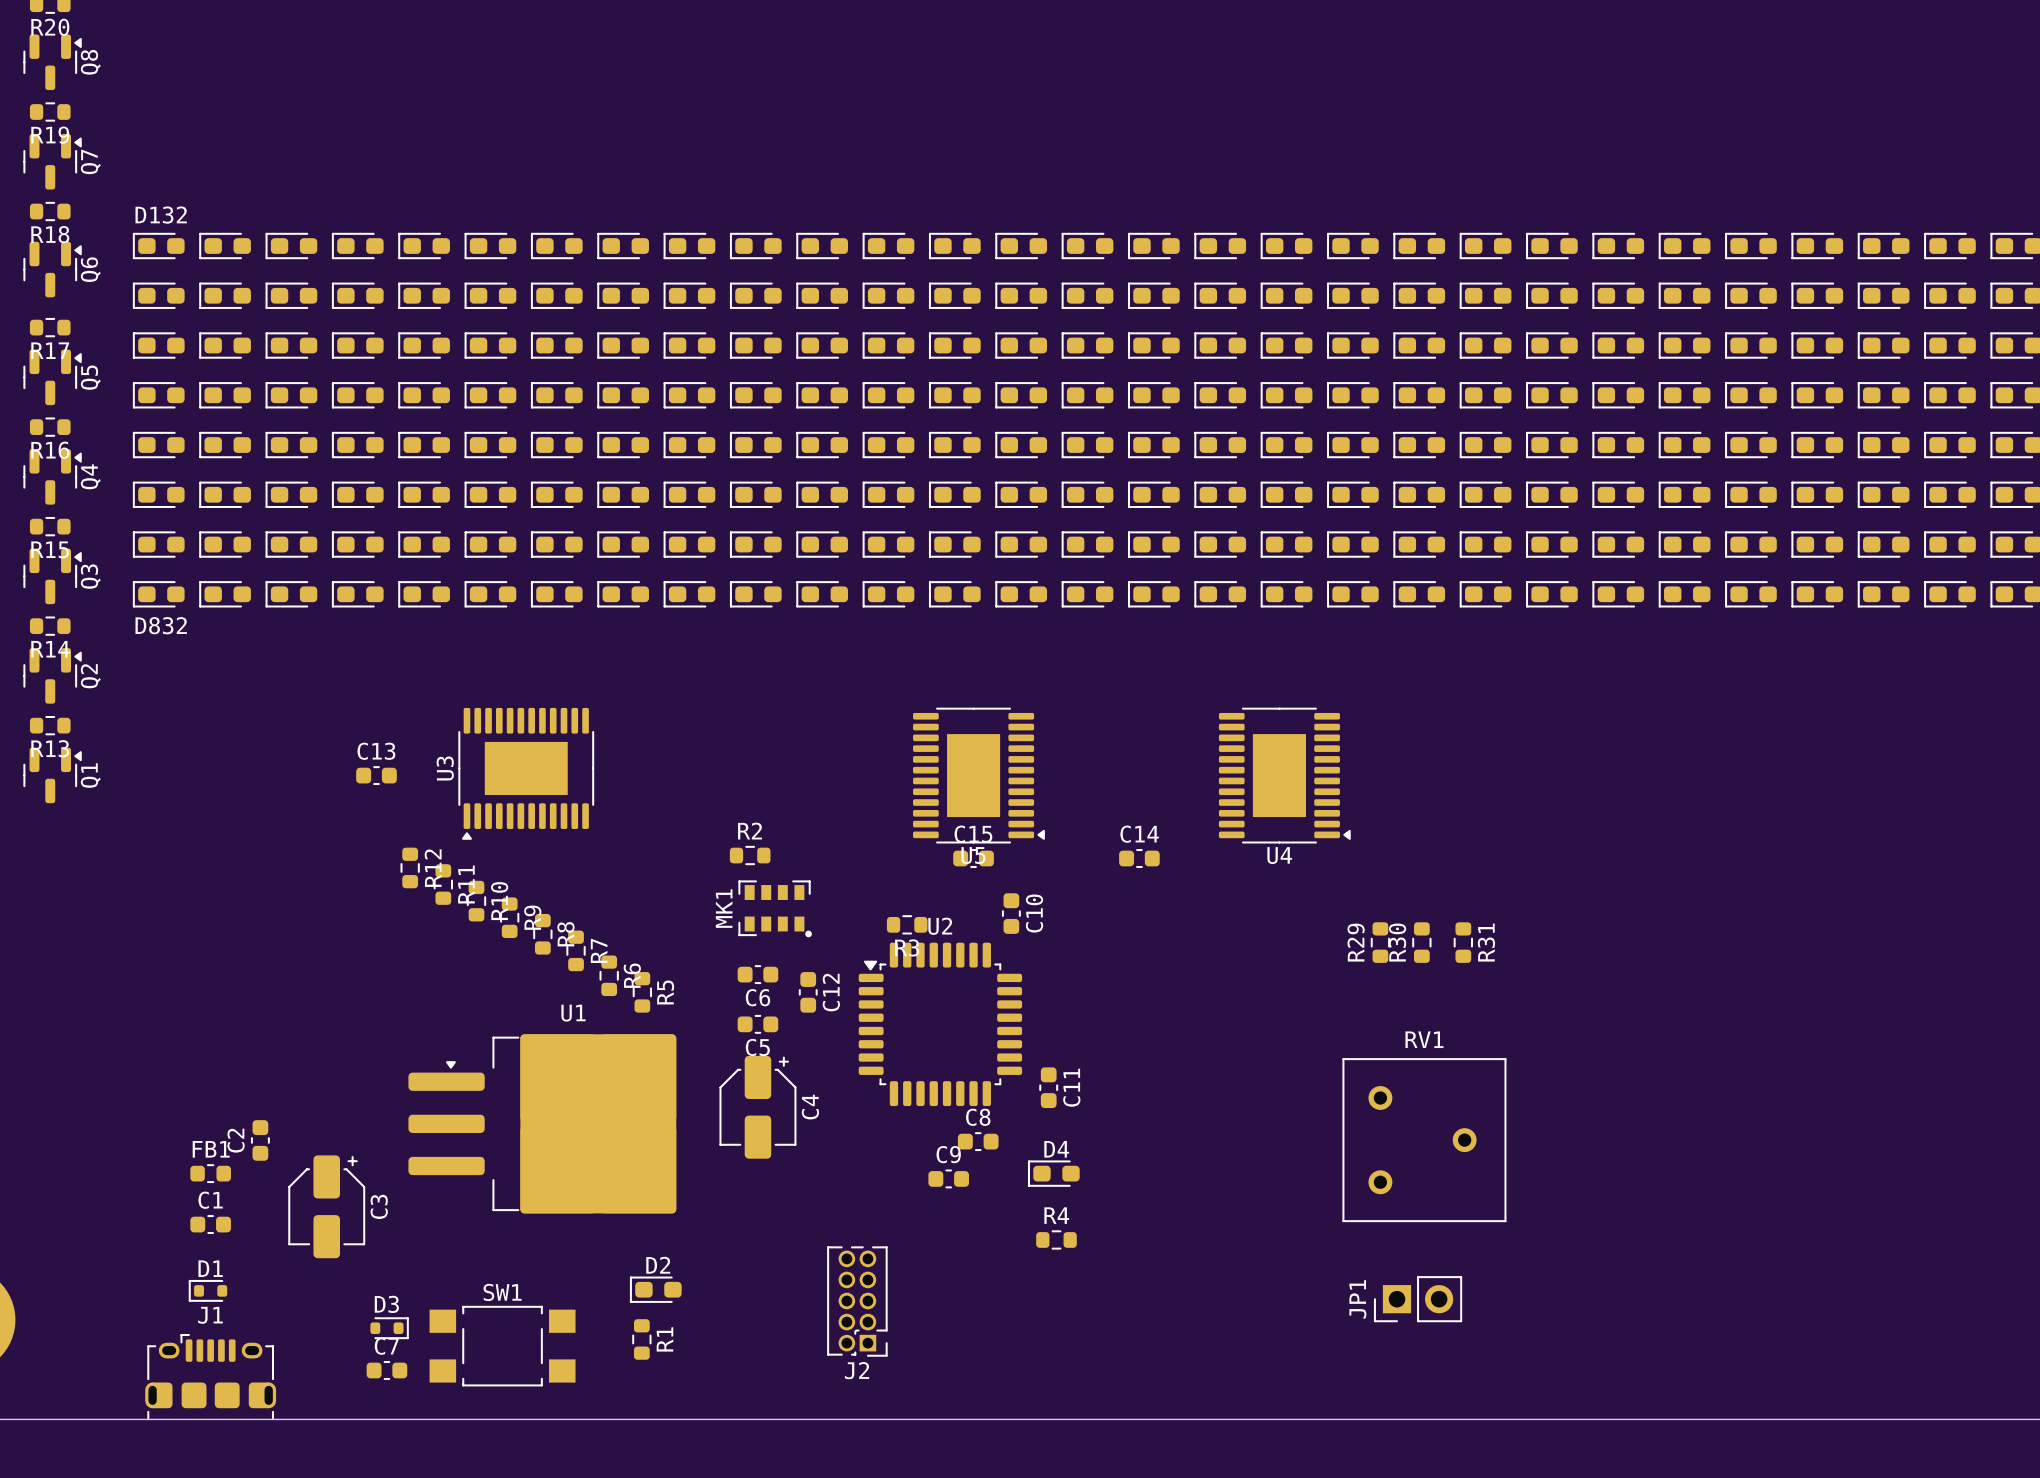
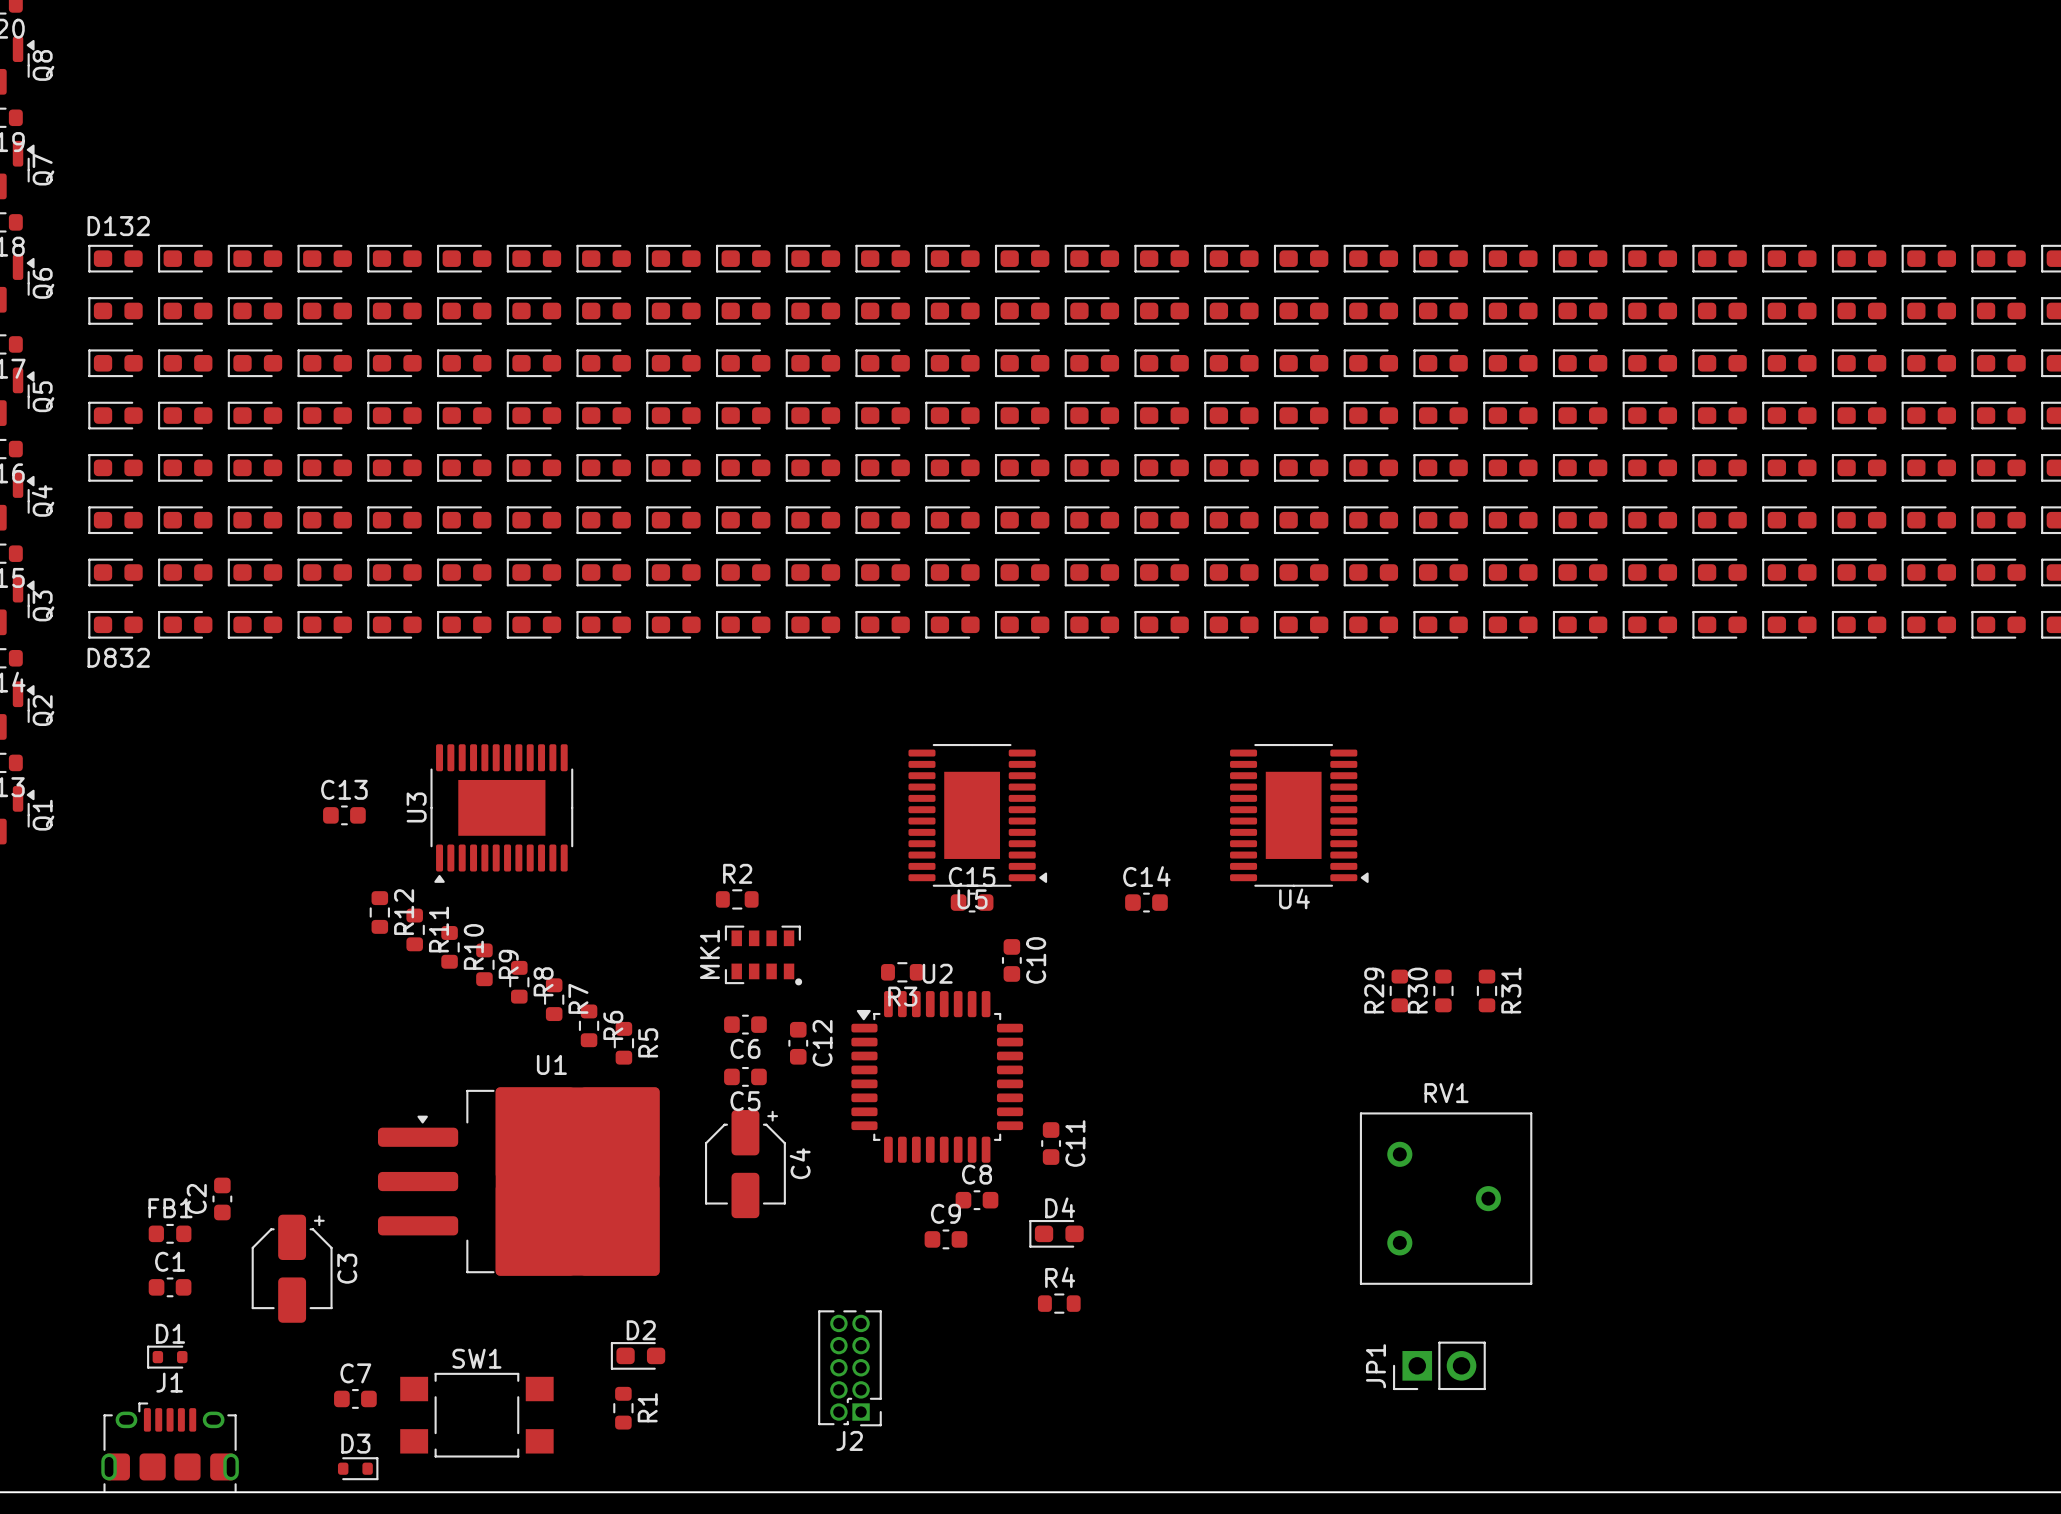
D3 position: (389, 1328) -> (358, 1468)
C7 position: (386, 1370) -> (355, 1398)

